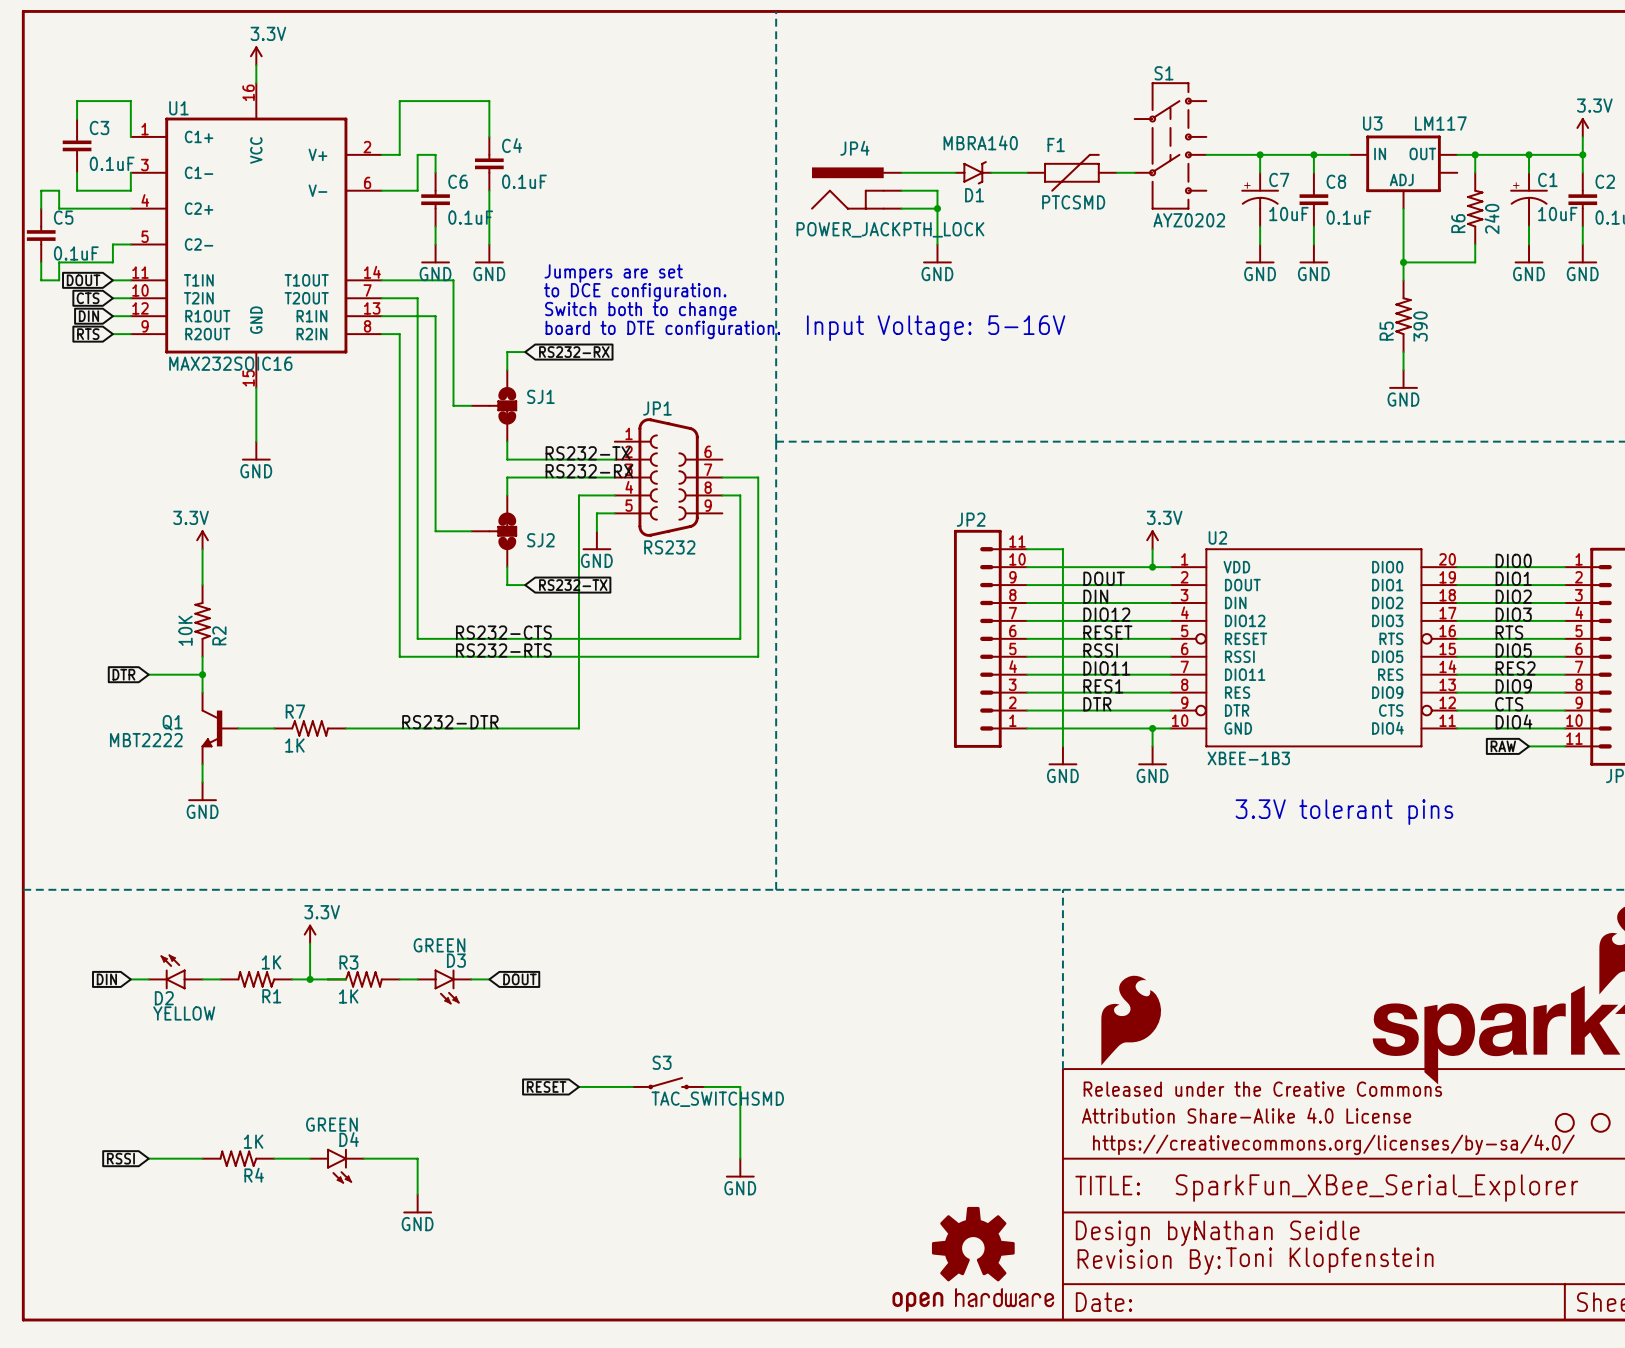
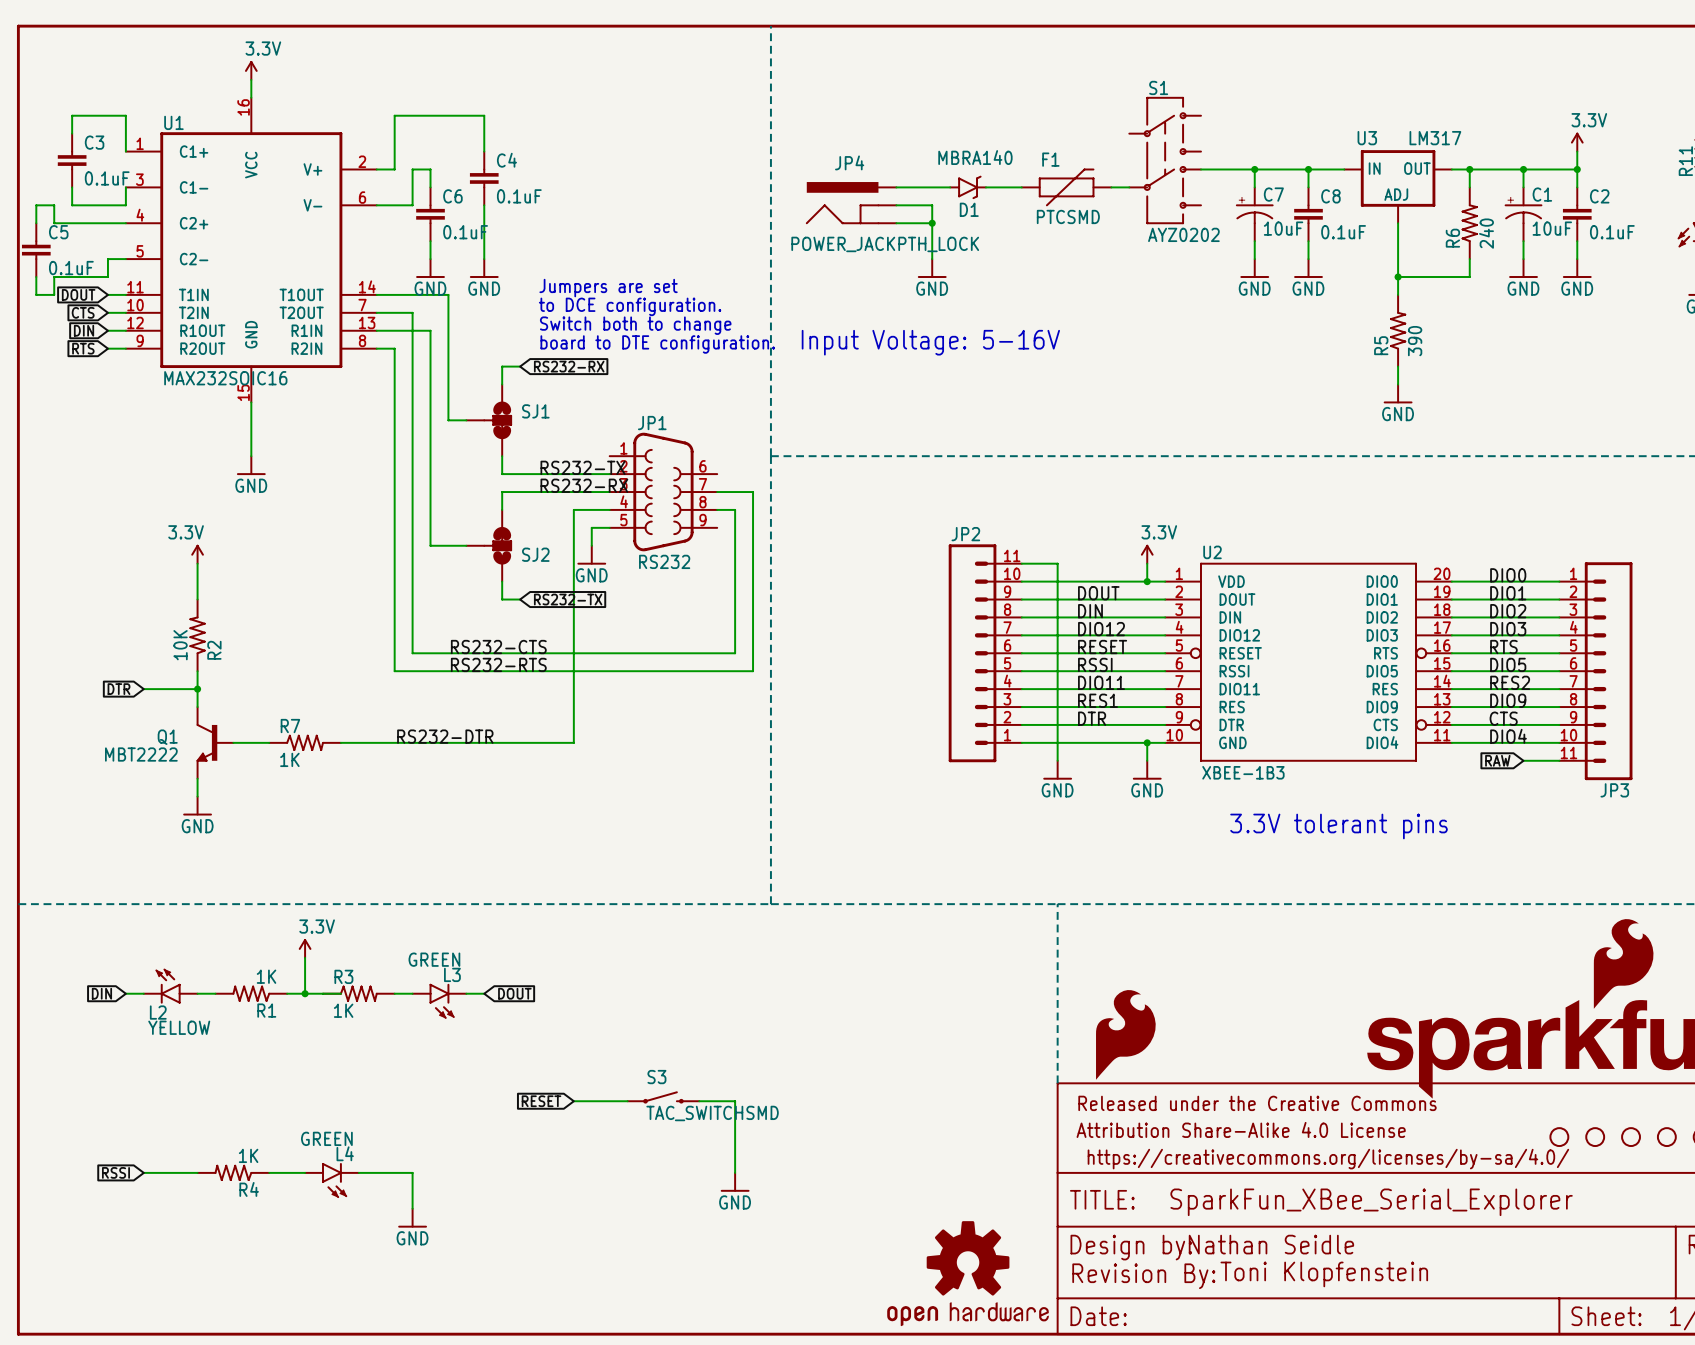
U3 value: LM117 (1440, 123) -> LM317 (1435, 138)
U3 symbol: [1349, 135, 1458, 209] -> [1344, 150, 1452, 224]
D3 name: D3 (456, 960) -> L3 (452, 974)
D2 name: D2 (164, 998) -> L2 (158, 1012)
D4 name: D4 (349, 1139) -> L4 (345, 1153)

